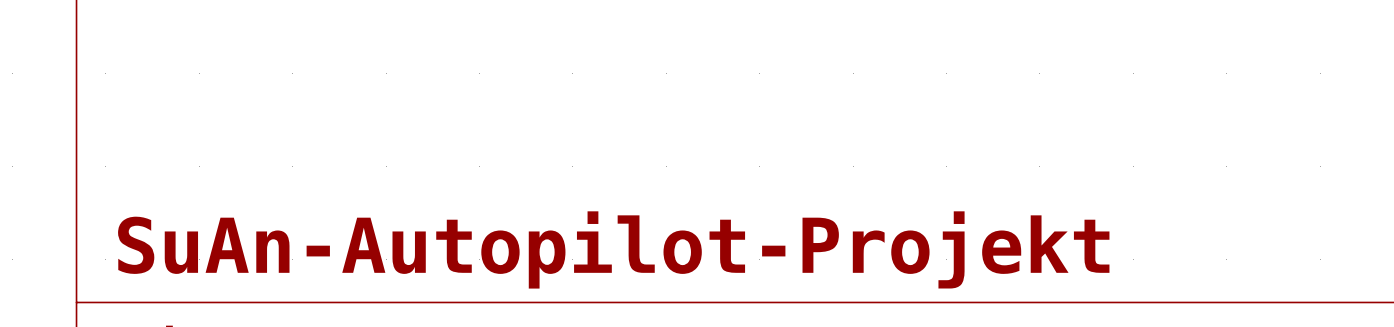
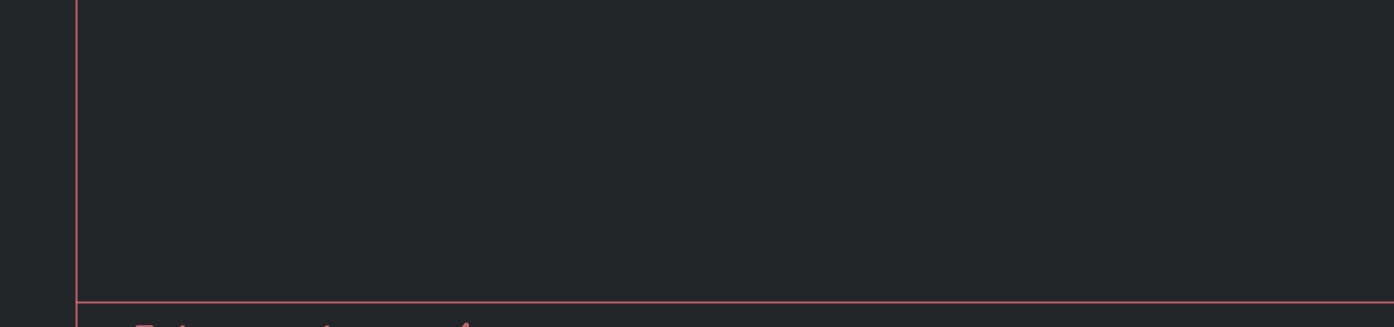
title block: SuAn-Autopilot-Projekt (613, 249) -> none

